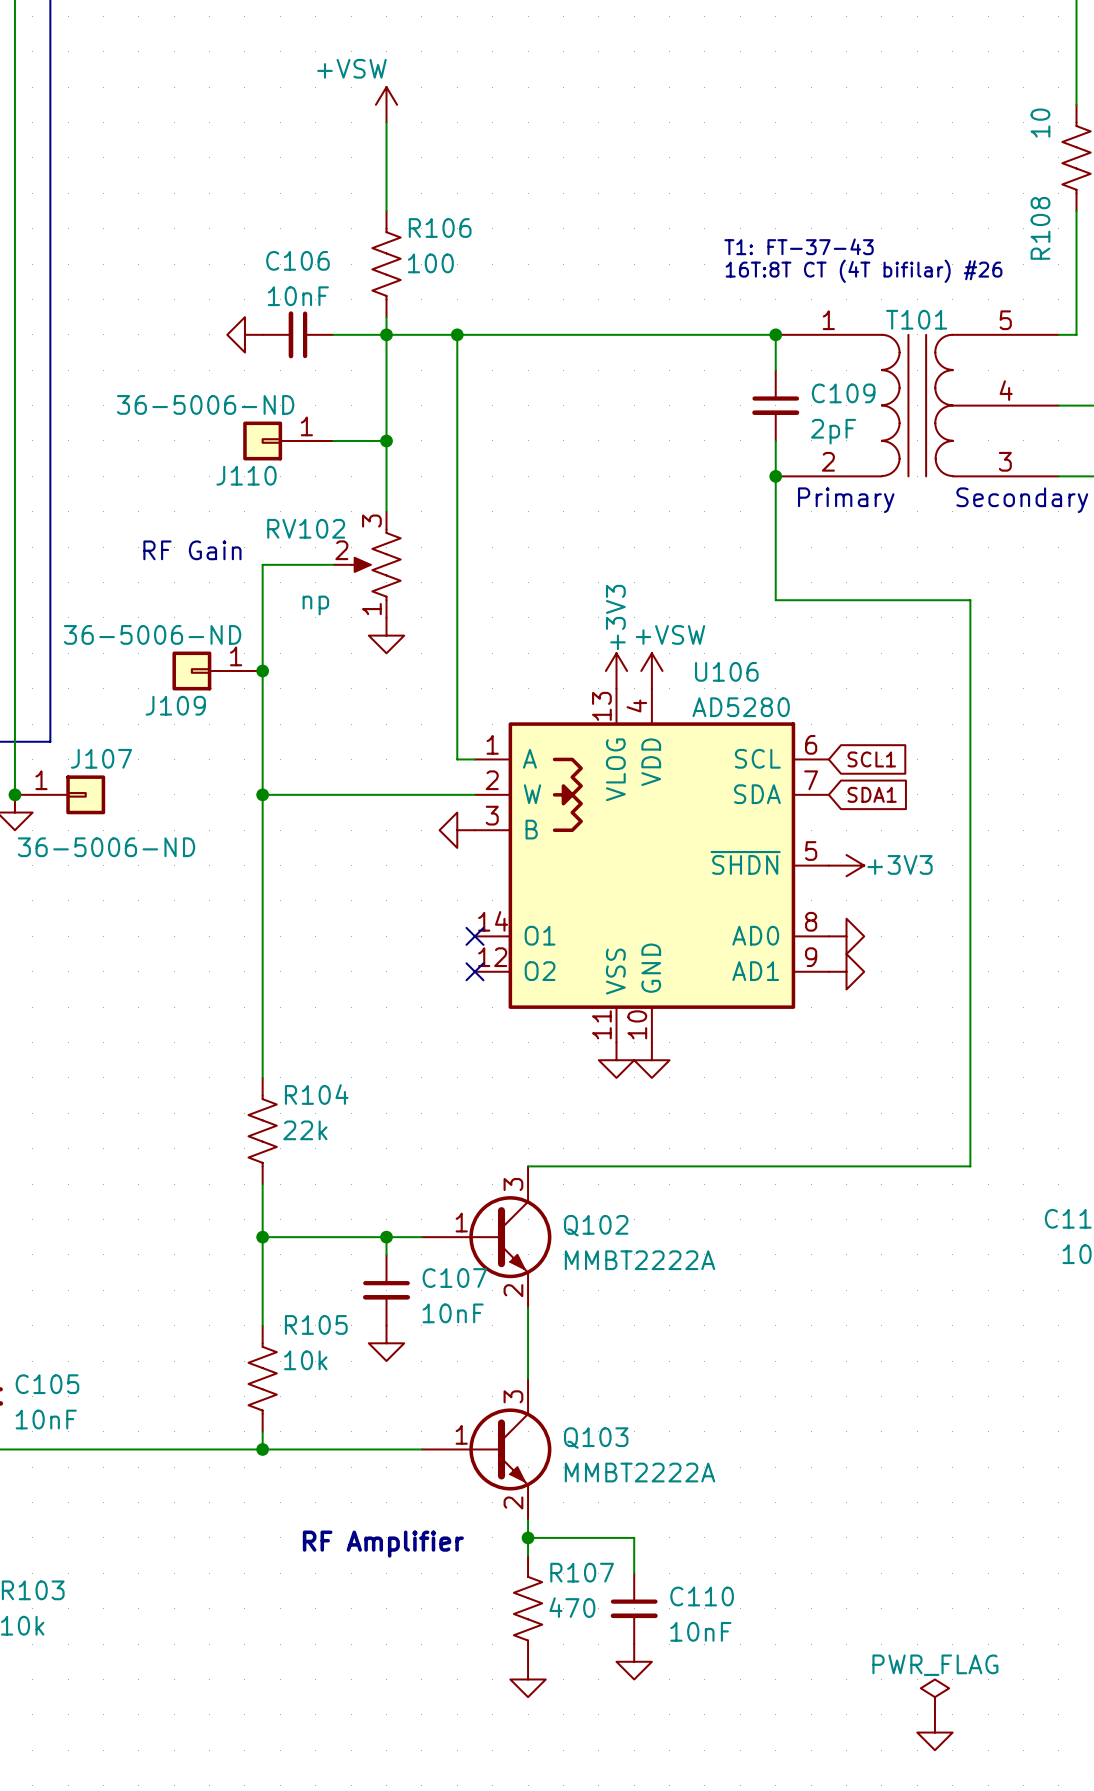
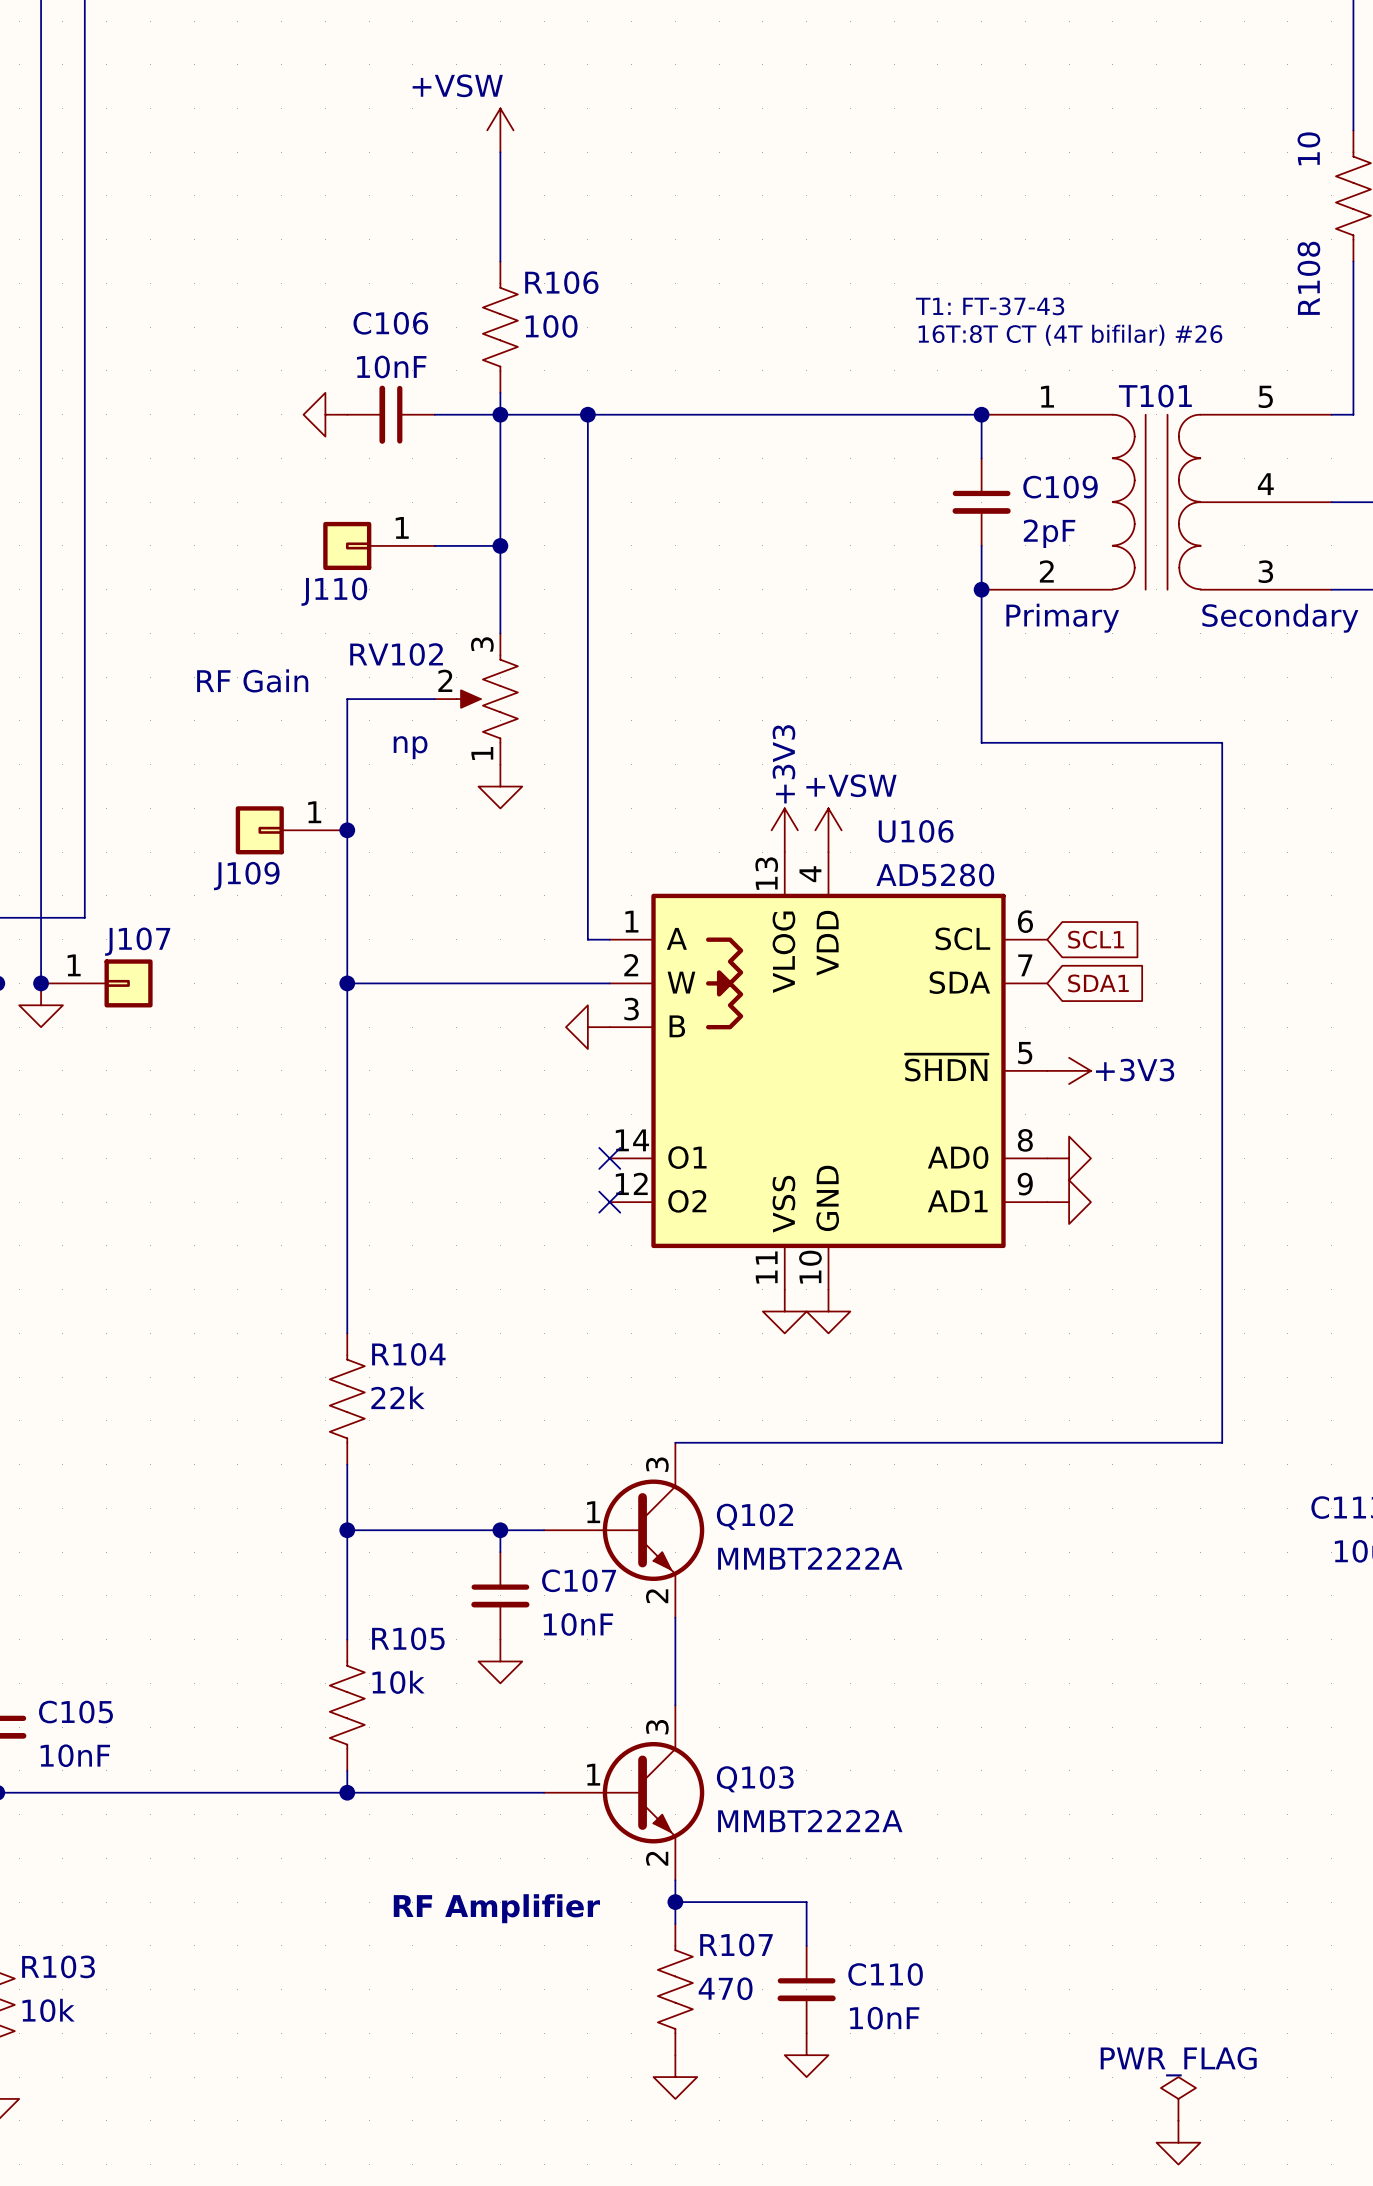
J110 value: 36-5006-ND (205, 404) -> none
J109 value: 36-5006-ND (152, 634) -> none
J107 value: 36-5006-ND (106, 847) -> none

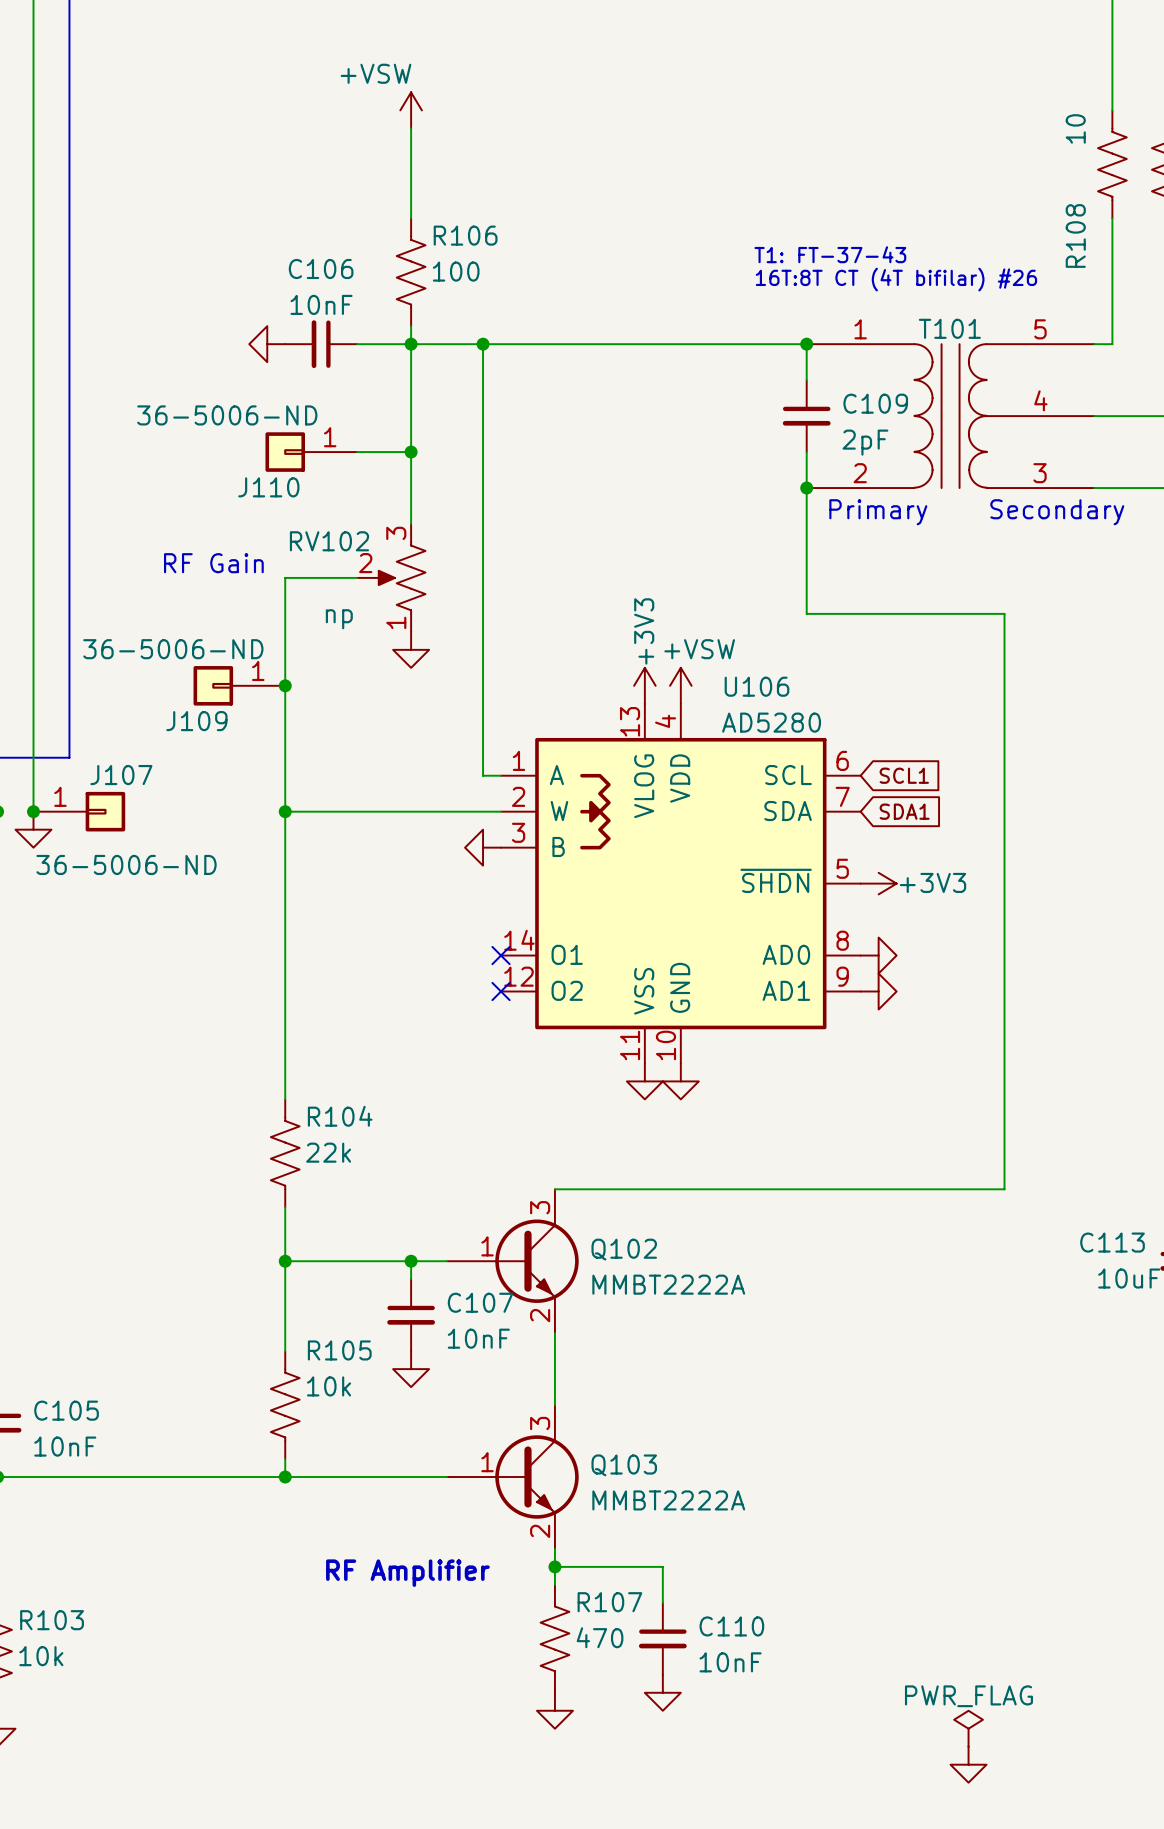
J110 value: none -> 36-5006-ND (227, 415)
J109 value: none -> 36-5006-ND (173, 649)
J107 value: none -> 36-5006-ND (126, 864)

